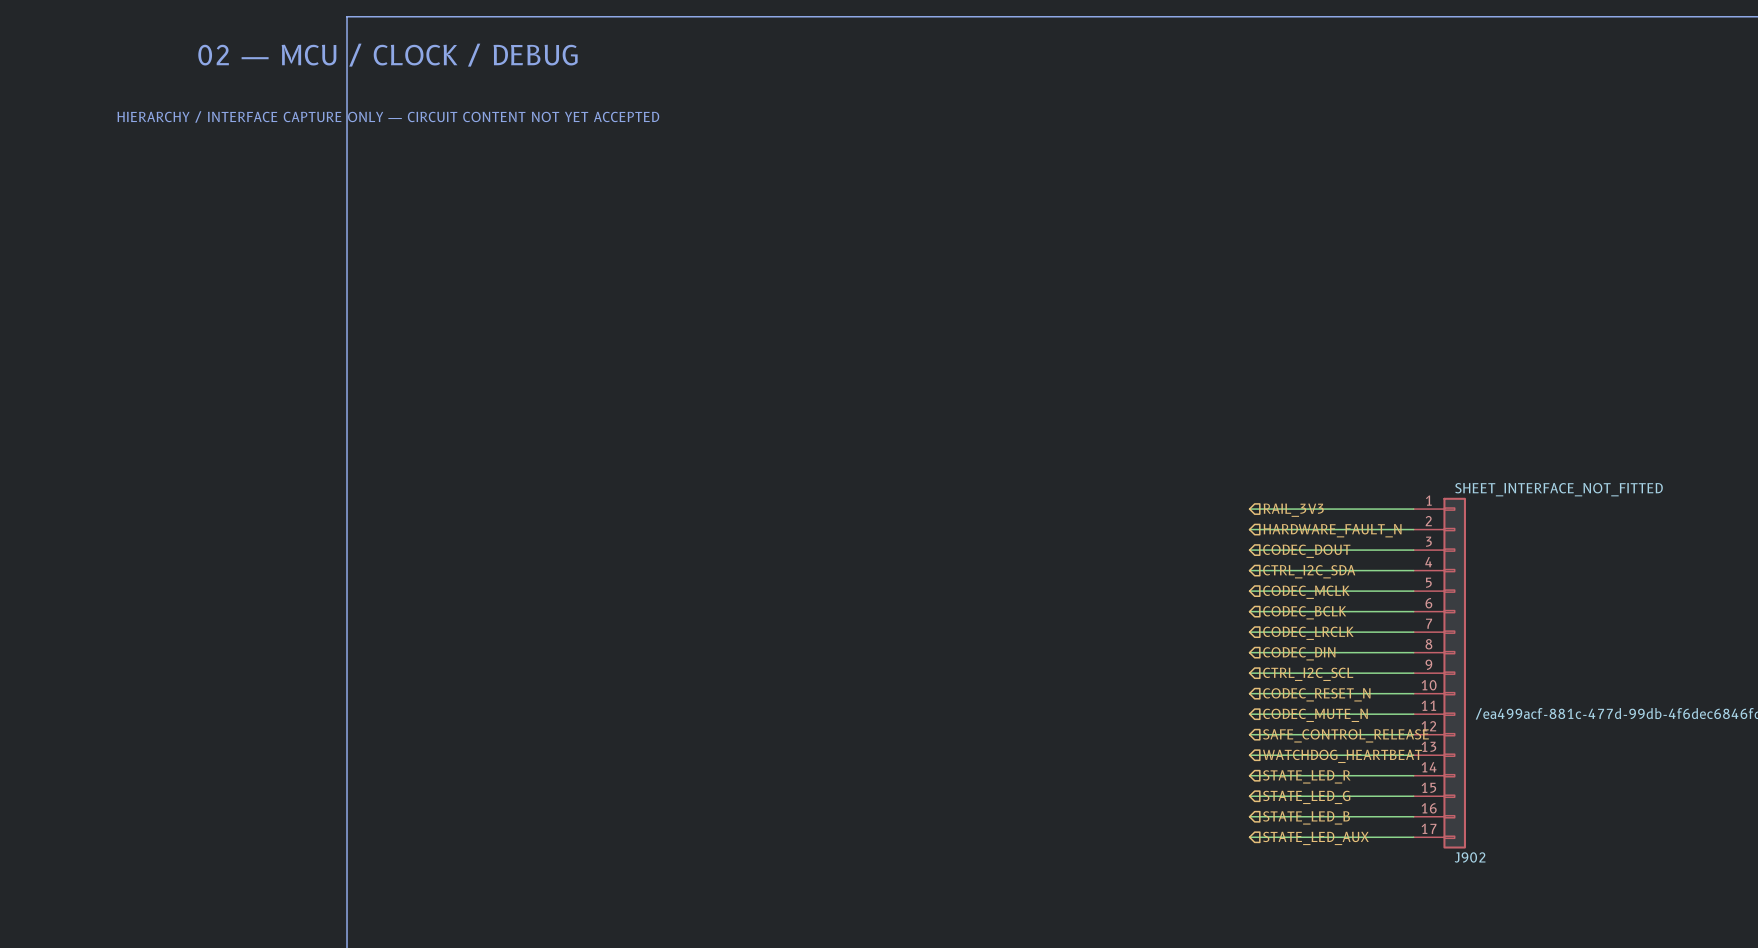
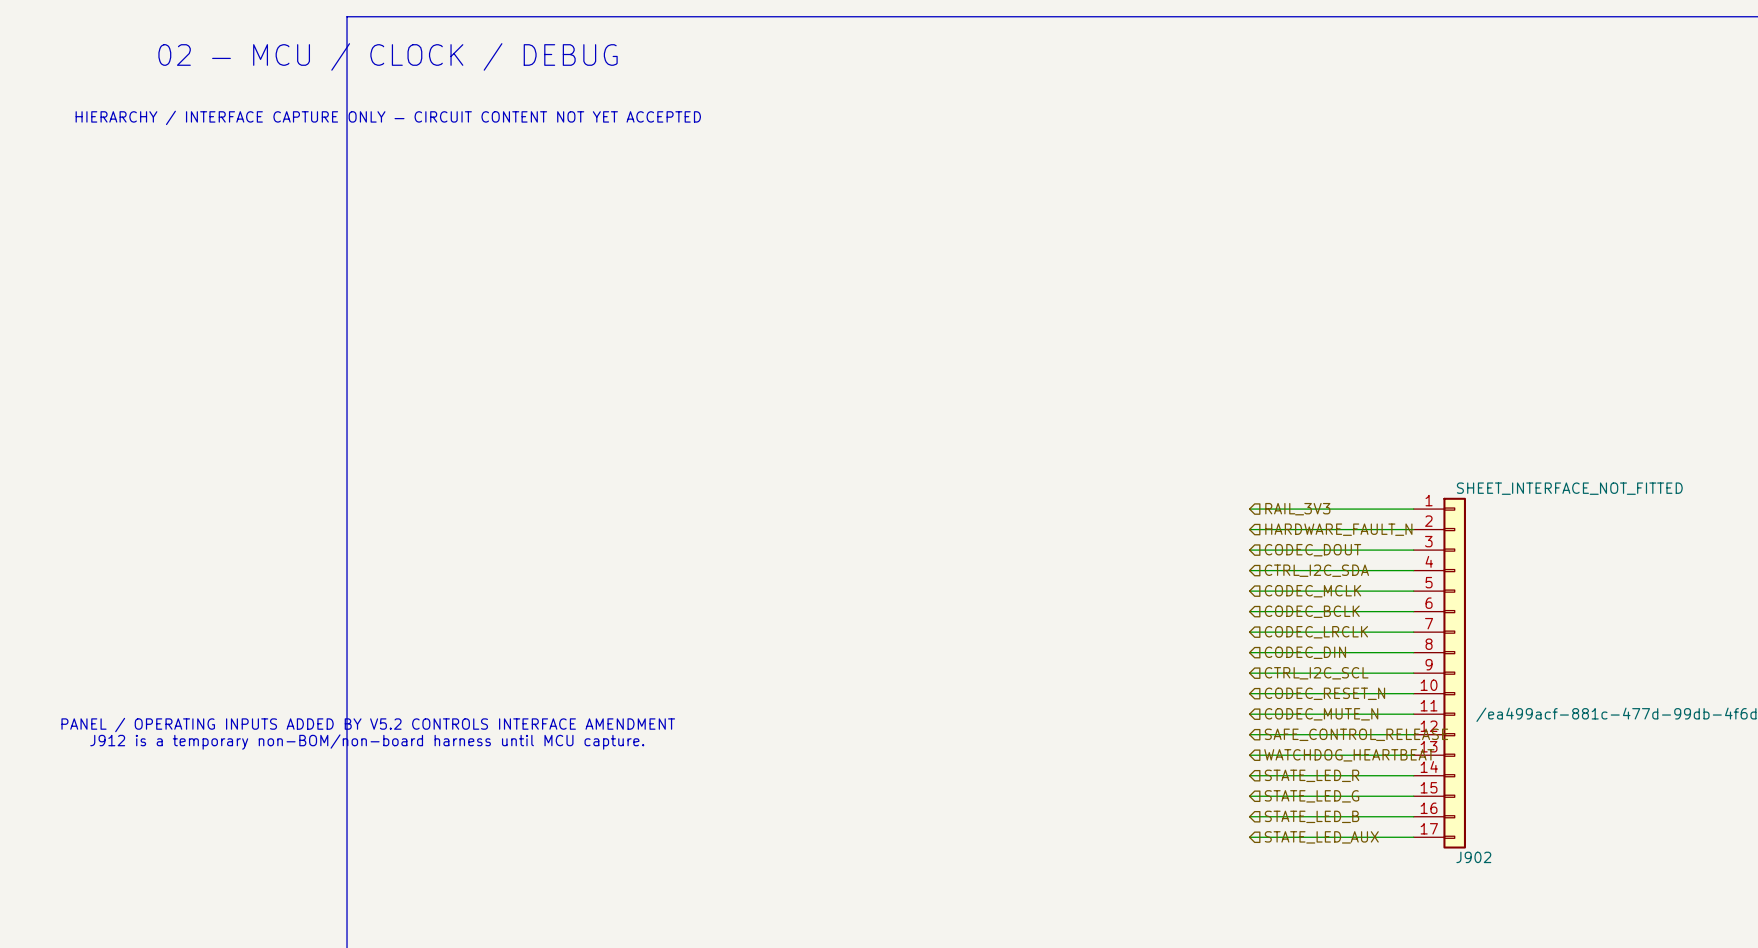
text: none -> PANEL / OPERATING INPUTS ADDED BY V5.2 CONTROLS INTERFACE AMENDMENT (368, 725)
text: none -> J912 is a temporary non-BOM/non-board harness until MCU capture. (367, 742)

